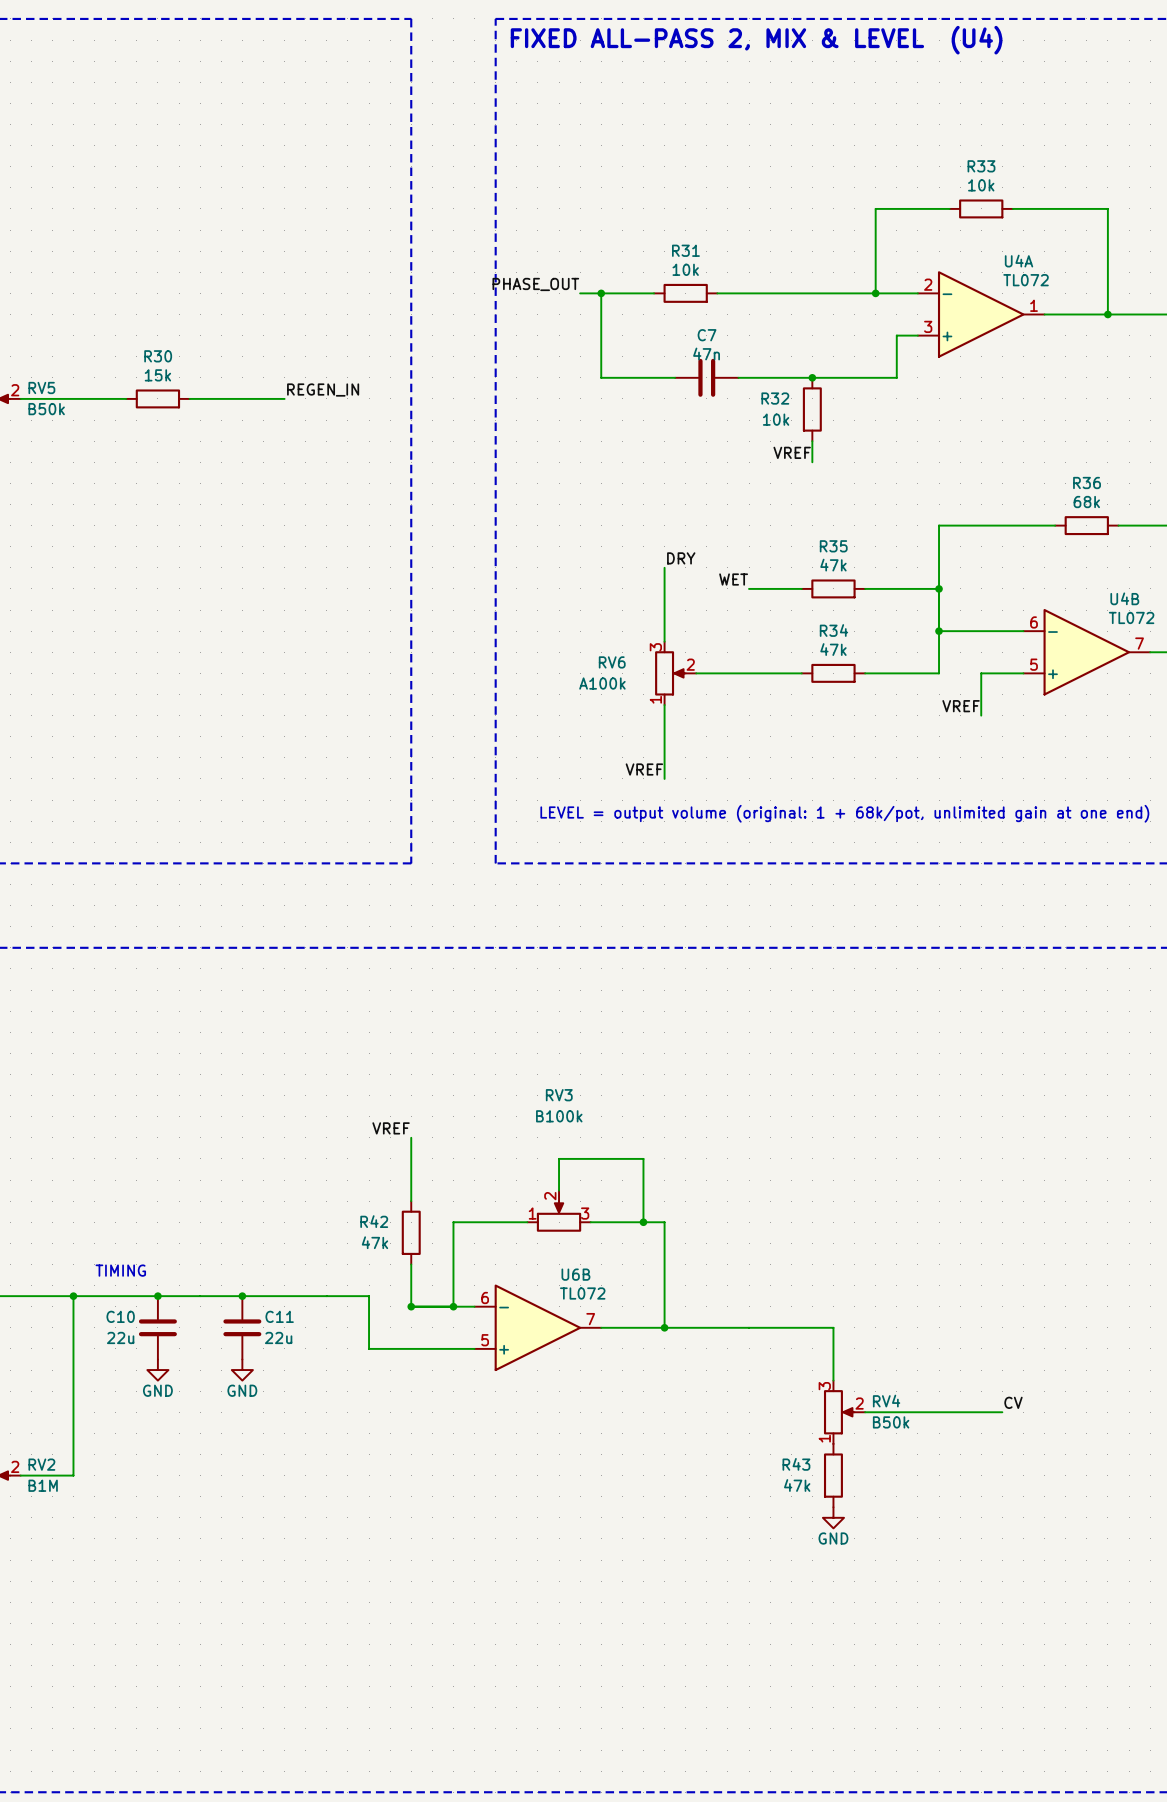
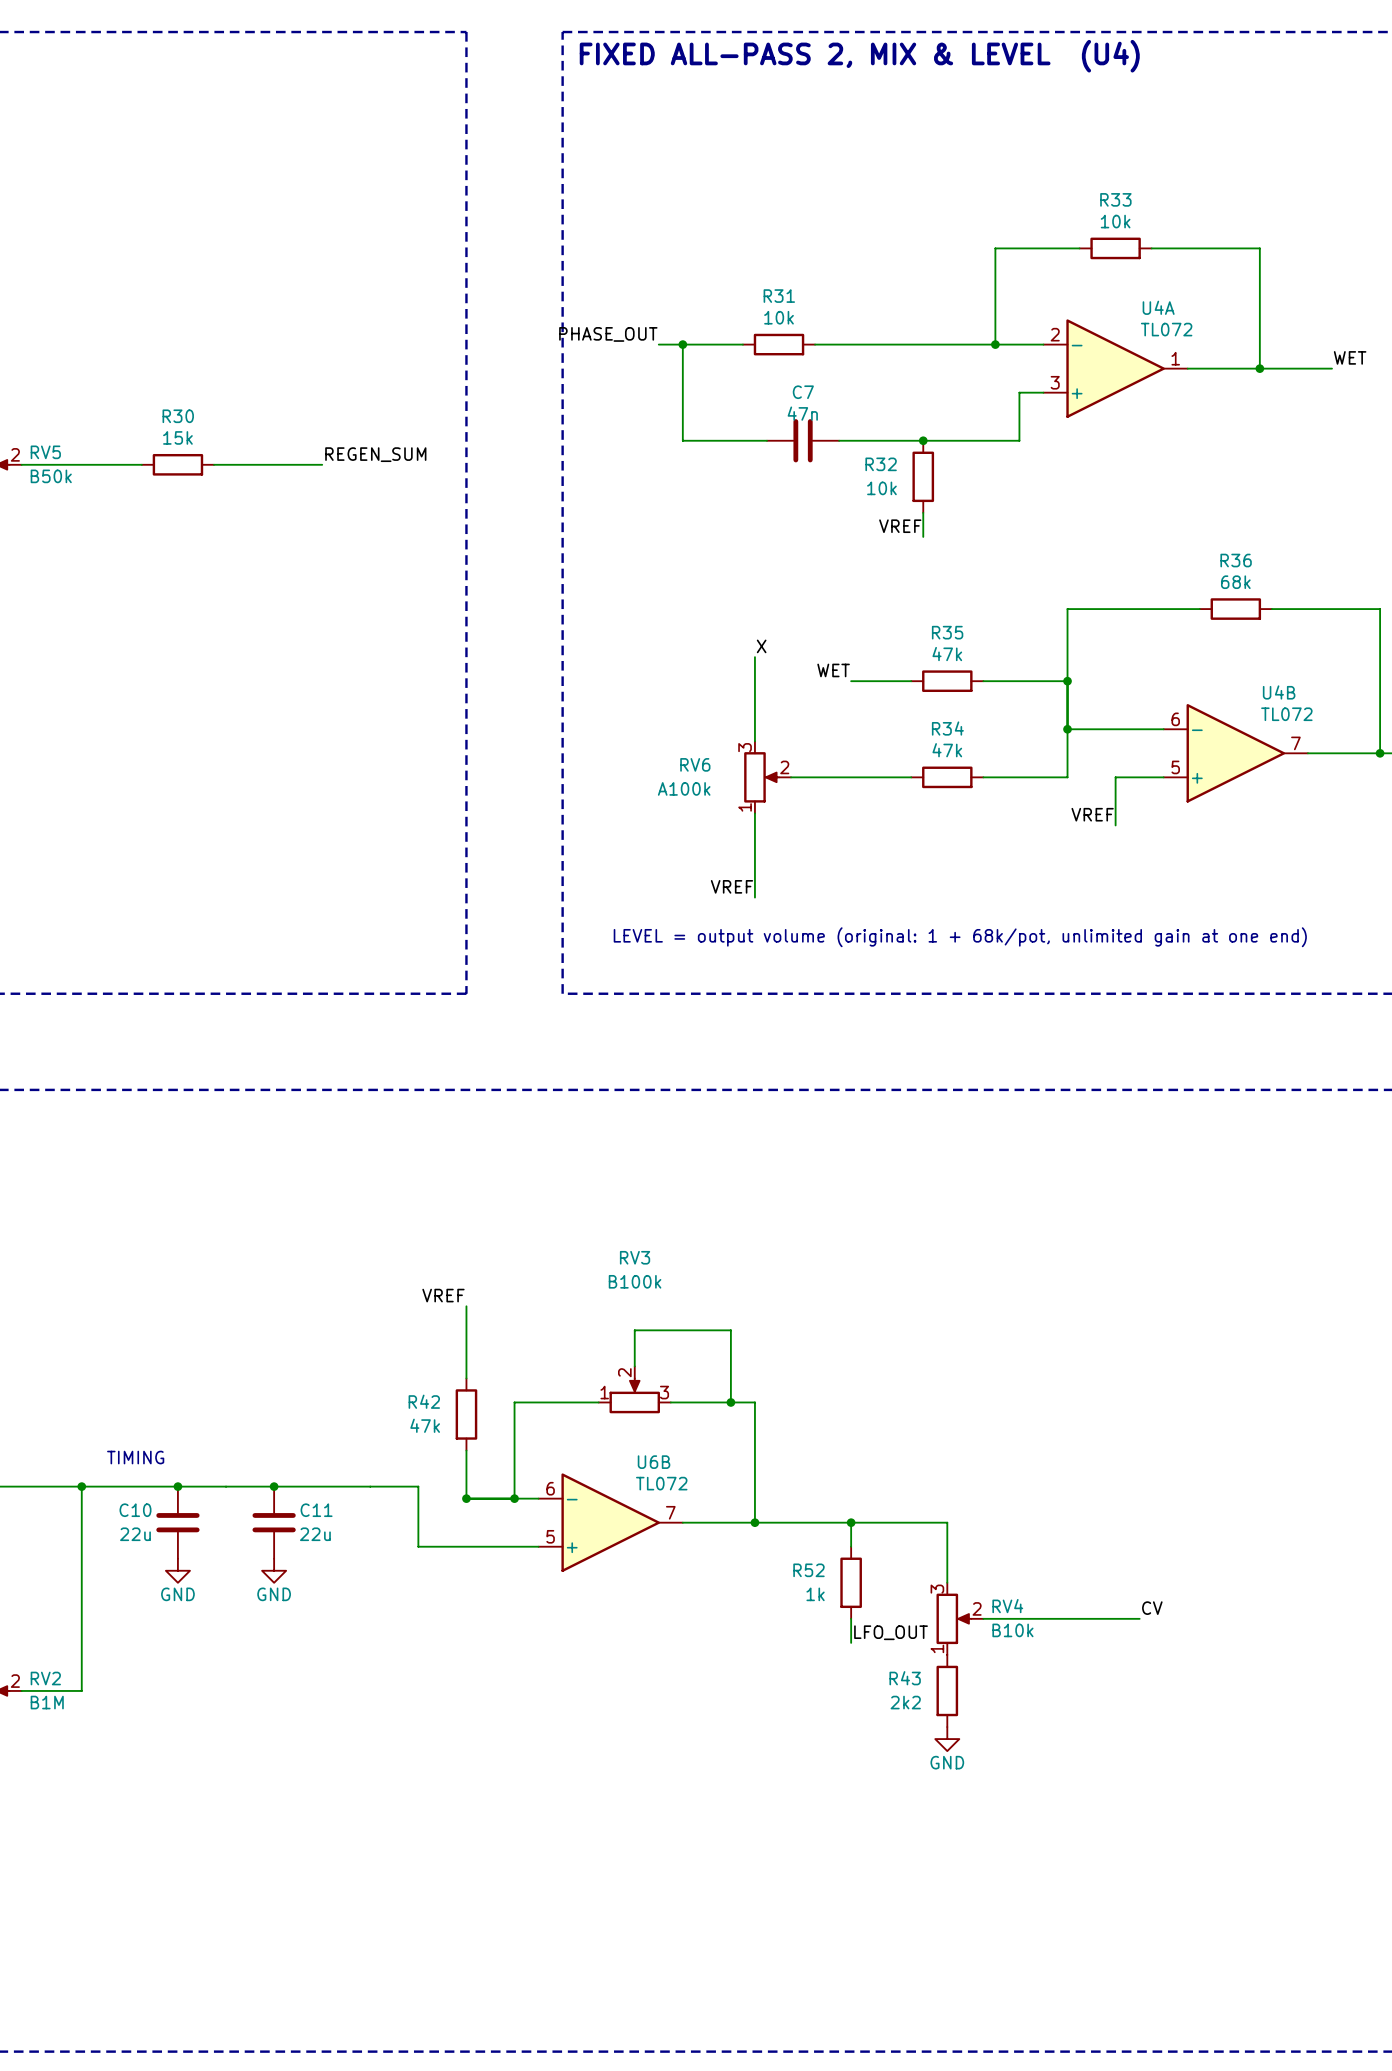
label: REGEN_IN (323, 390) -> REGEN_SUM (375, 454)
label: DRY (681, 558) -> X (761, 646)
wire: none -> (851, 1522) (851, 1546)
junction: none -> (851, 1522)
R52: none -> 1k (851, 1582)
wire: none -> (851, 1618) (851, 1642)
RV4 value: B50k (891, 1422) -> B10k (1012, 1630)
label: none -> LFO_OUT (891, 1632)
R43 value: 47k (797, 1485) -> 2k2 (905, 1702)

